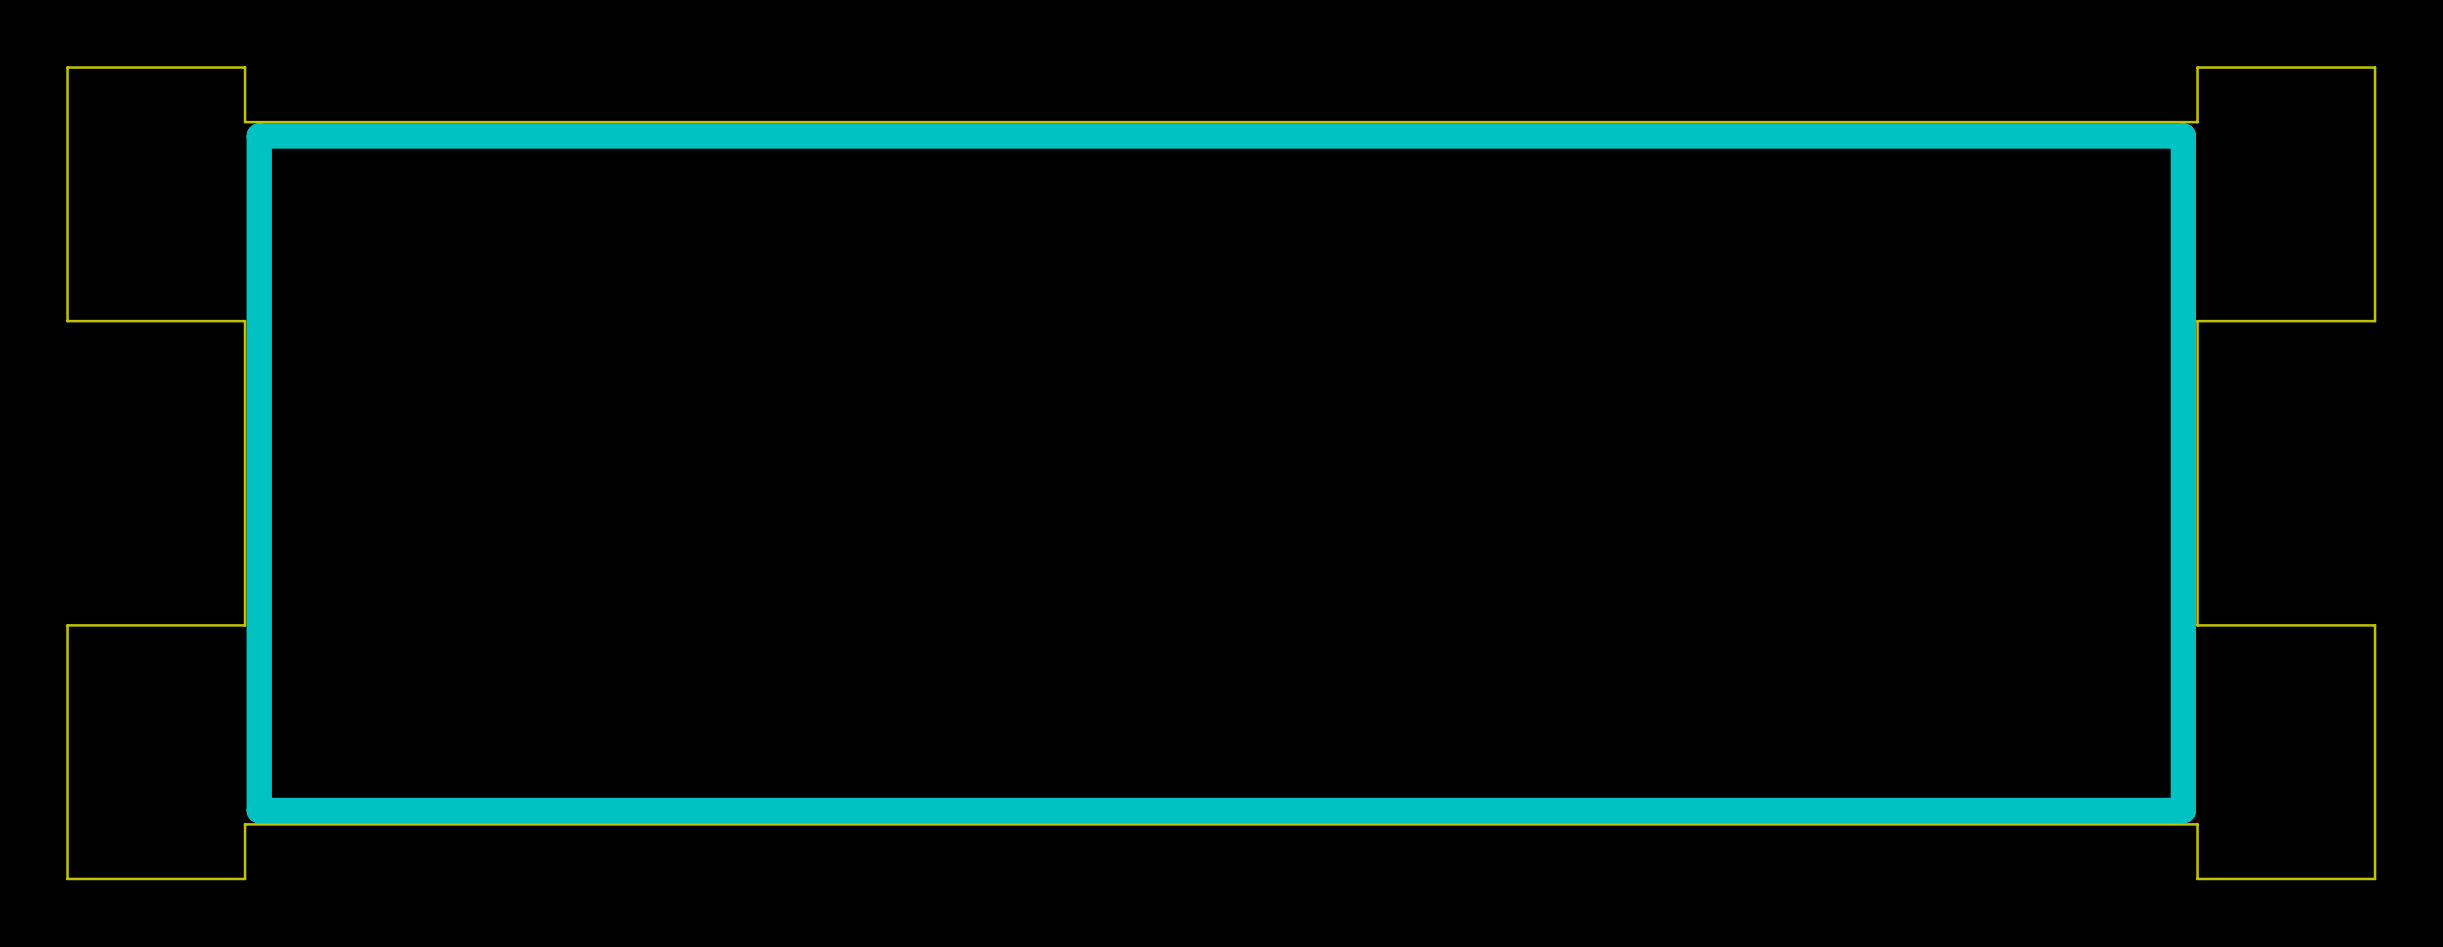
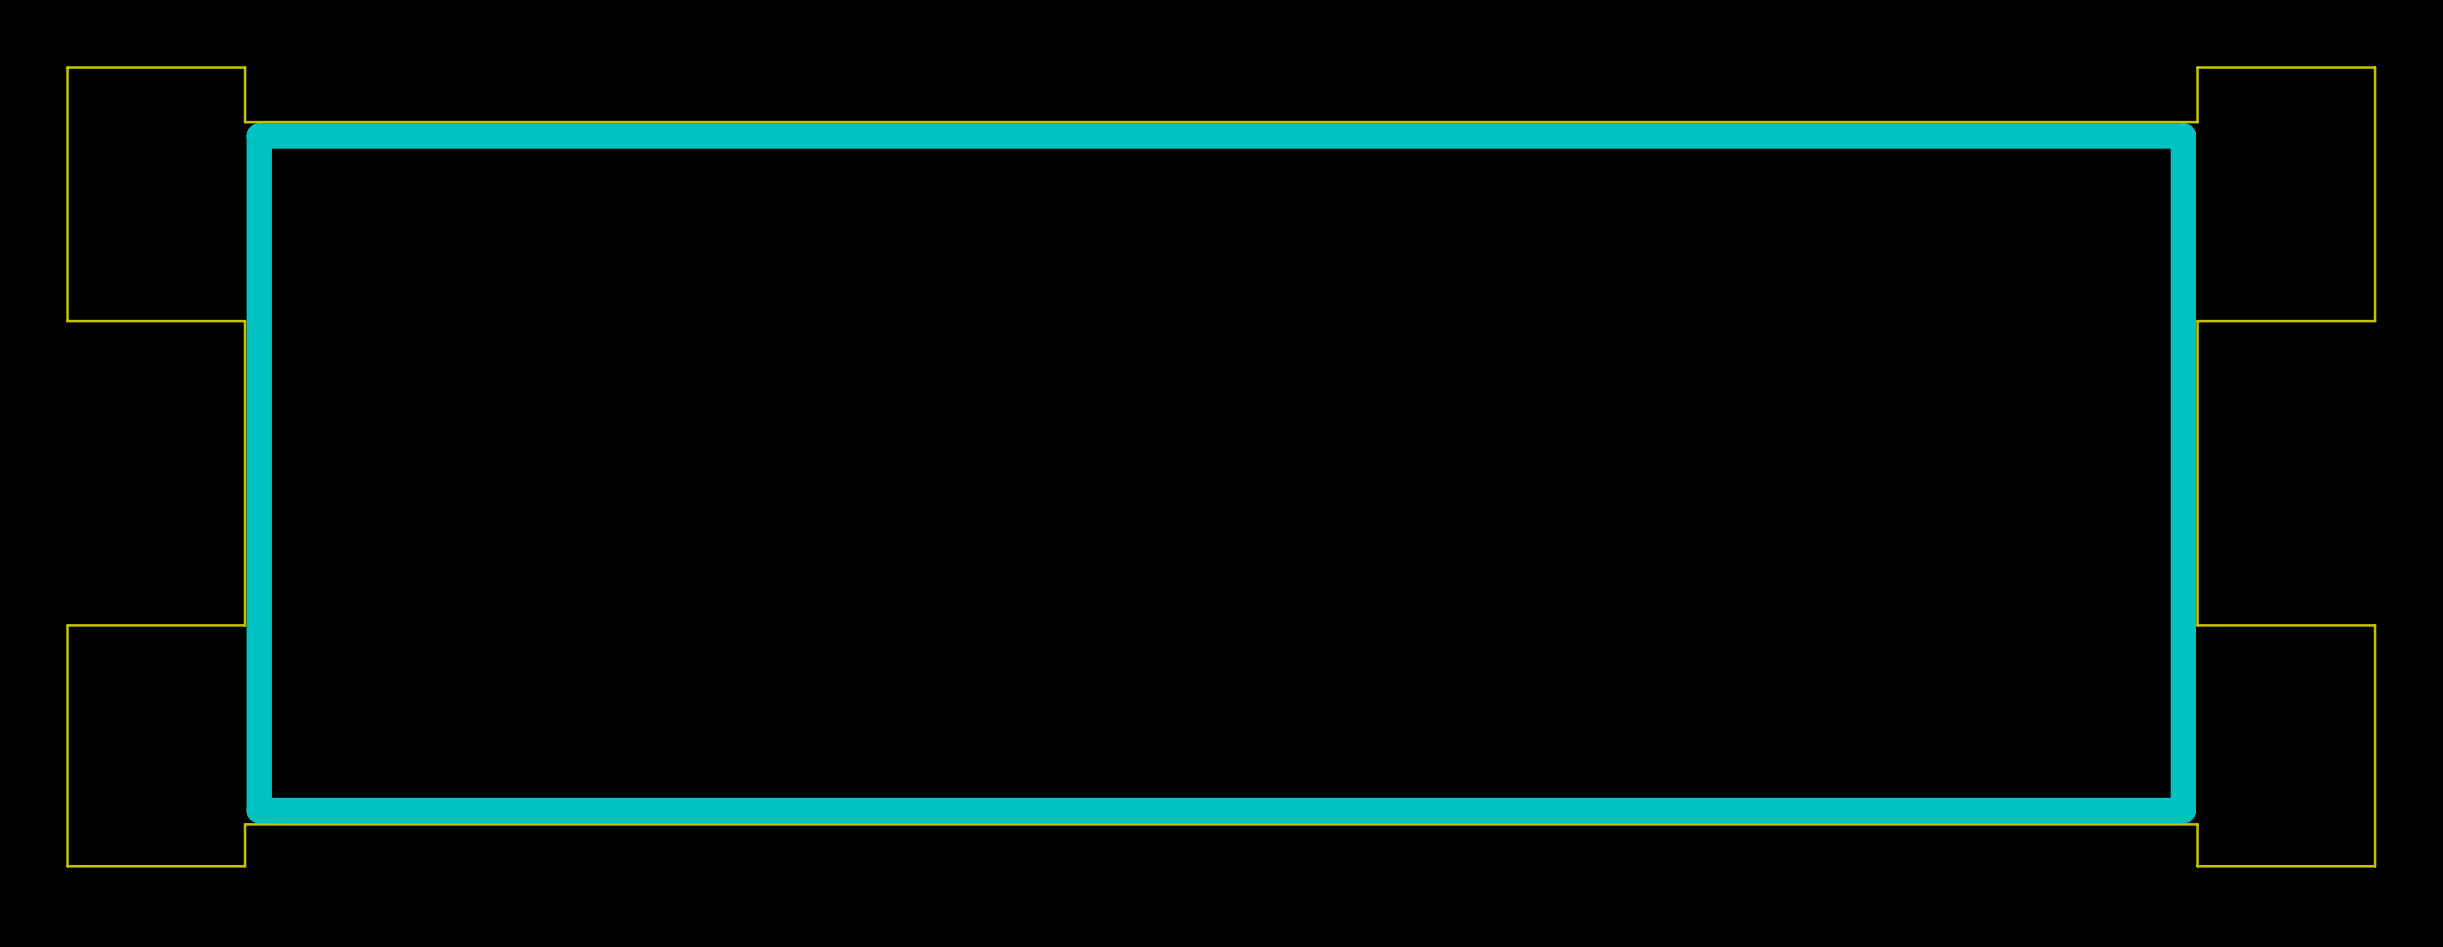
drawing shape: [66, 66, 2377, 881] -> [66, 66, 2377, 868]

